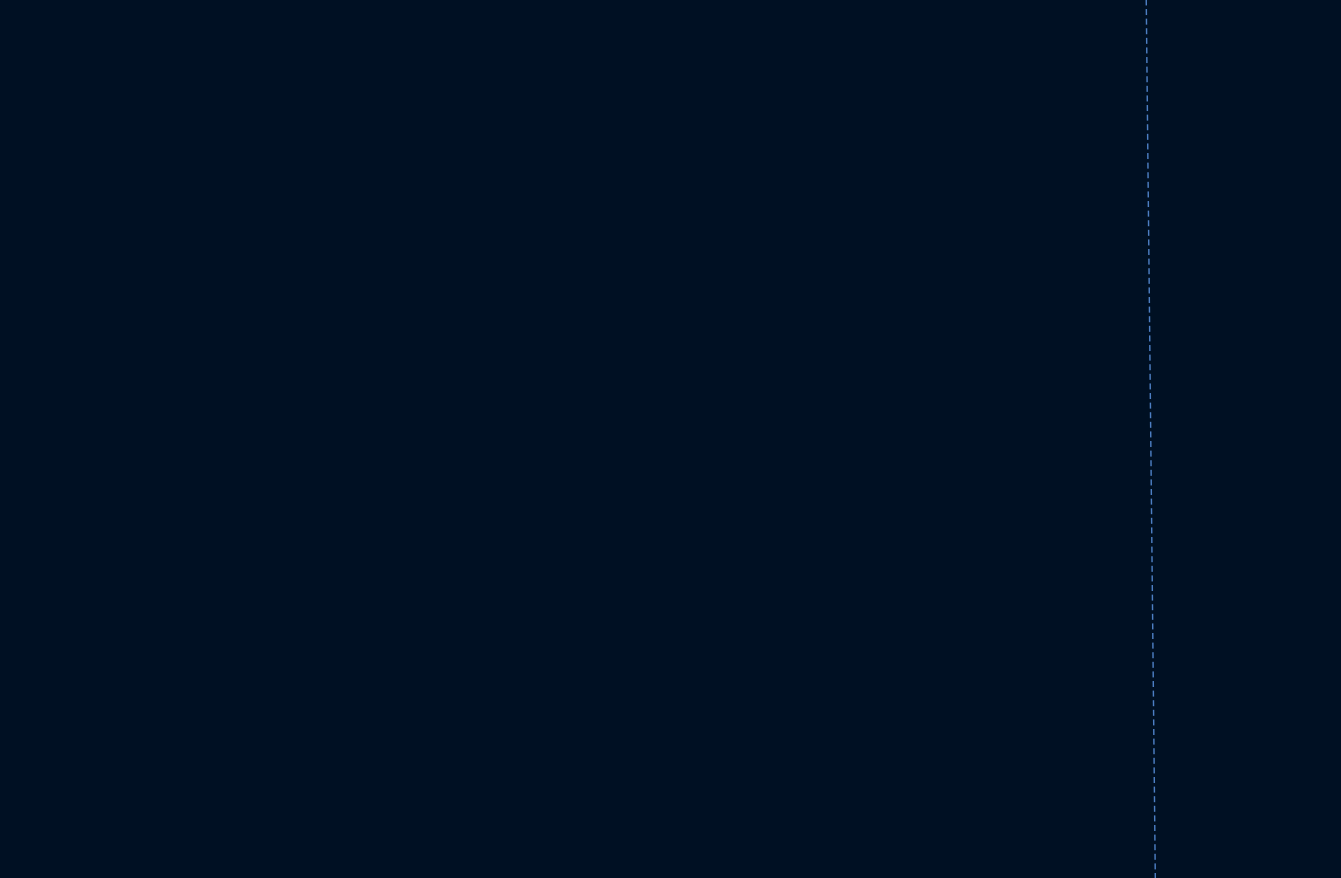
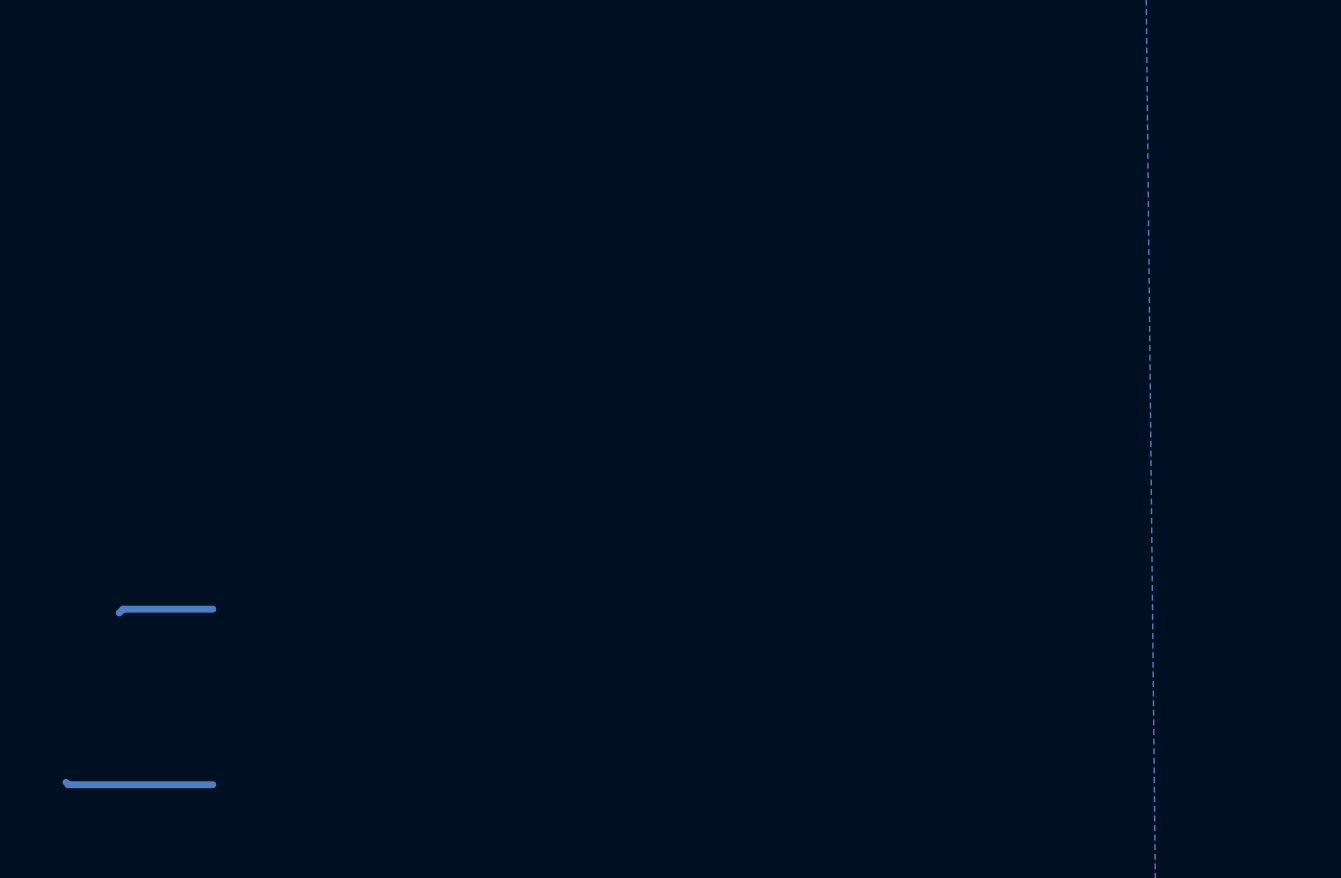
track: none -> (212, 609) (122, 609) (119, 612)
track: none -> (65, 782) (68, 784) (212, 784)

